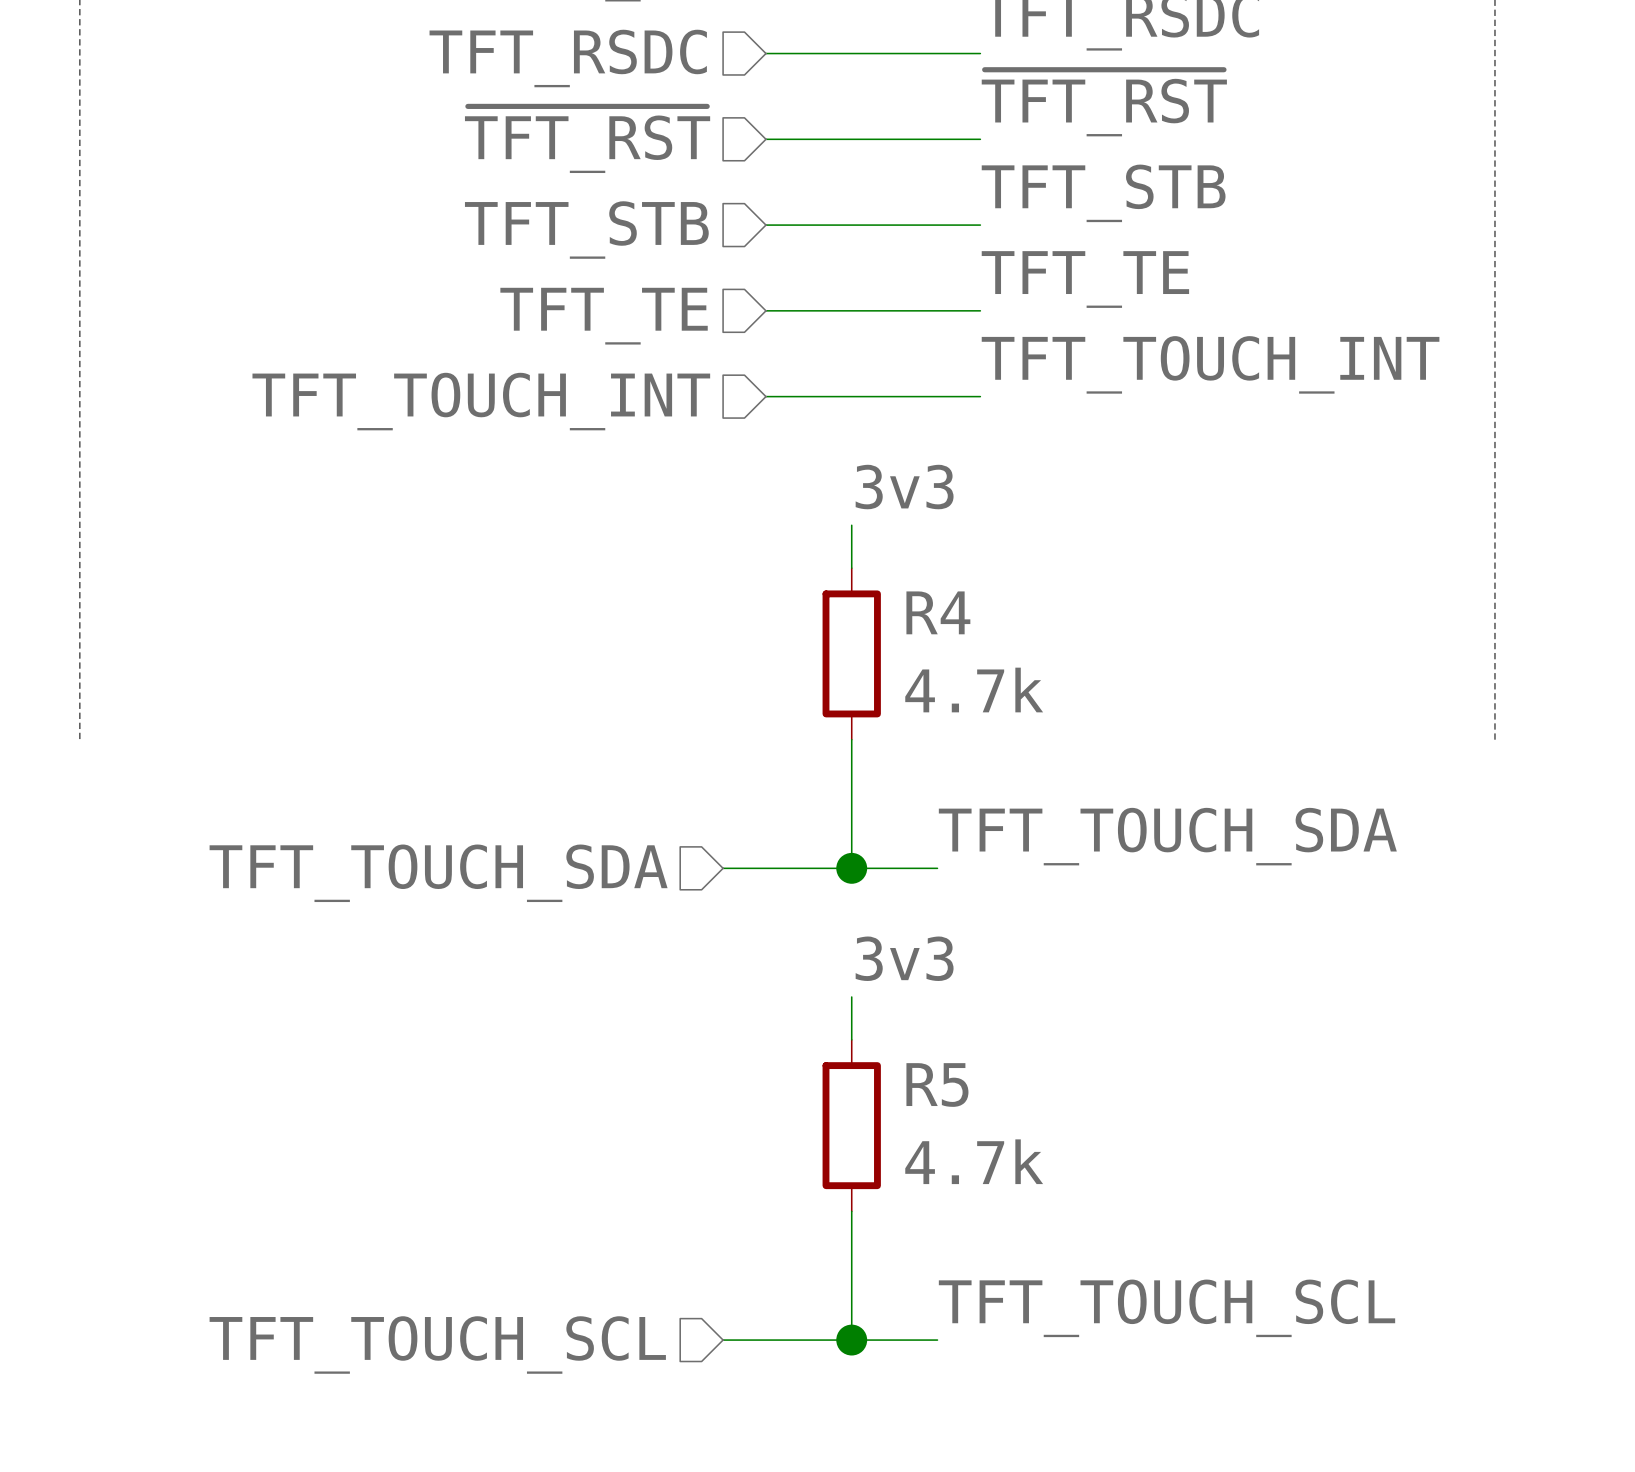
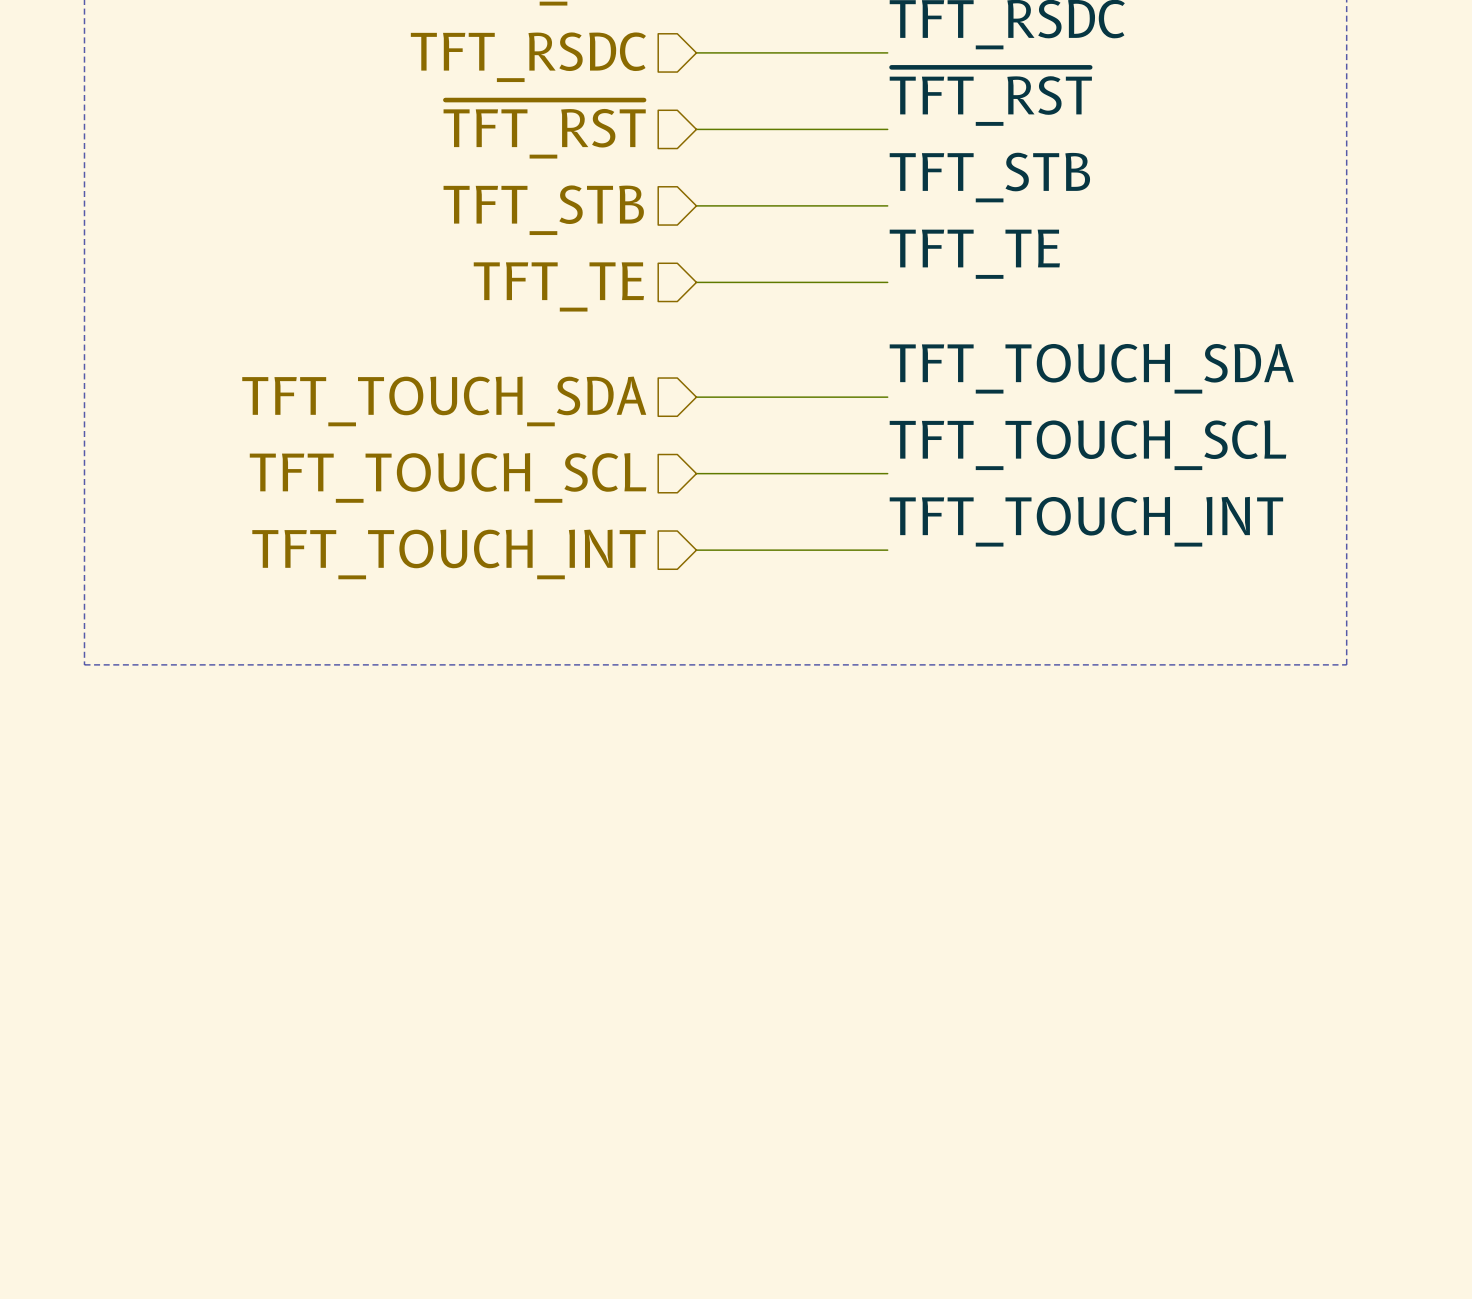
label position: TFT_TOUCH_INT (1210, 364) -> TFT_TOUCH_INT (1086, 521)
wire: (765, 396) (980, 396) -> (696, 397) (887, 397)
hierarchical label position: TFT_TOUCH_INT (481, 401) -> TFT_TOUCH_INT (449, 554)
label: 3v3 (904, 487) -> none
wire: (851, 525) (851, 568) -> none
R4: 4.7k (851, 653) -> none
line: none -> (84, 664) (1346, 664)
wire: (851, 739) (851, 868) -> none
label position: TFT_TOUCH_SDA (1167, 836) -> TFT_TOUCH_SDA (1091, 368)
wire: (723, 868) (937, 868) -> (696, 550) (887, 550)
junction: (851, 868) -> none
hierarchical label position: TFT_TOUCH_SDA (438, 873) -> TFT_TOUCH_SDA (444, 401)
label: 3v3 (904, 958) -> none
wire: (851, 996) (851, 1039) -> none
R5: 4.7k (851, 1125) -> none
wire: (851, 1211) (851, 1340) -> none
label position: TFT_TOUCH_SCL (1167, 1308) -> TFT_TOUCH_SCL (1088, 445)
wire: (723, 1340) (937, 1340) -> (696, 473) (887, 473)
junction: (851, 1340) -> none
hierarchical label position: TFT_TOUCH_SCL (437, 1345) -> TFT_TOUCH_SCL (448, 477)

